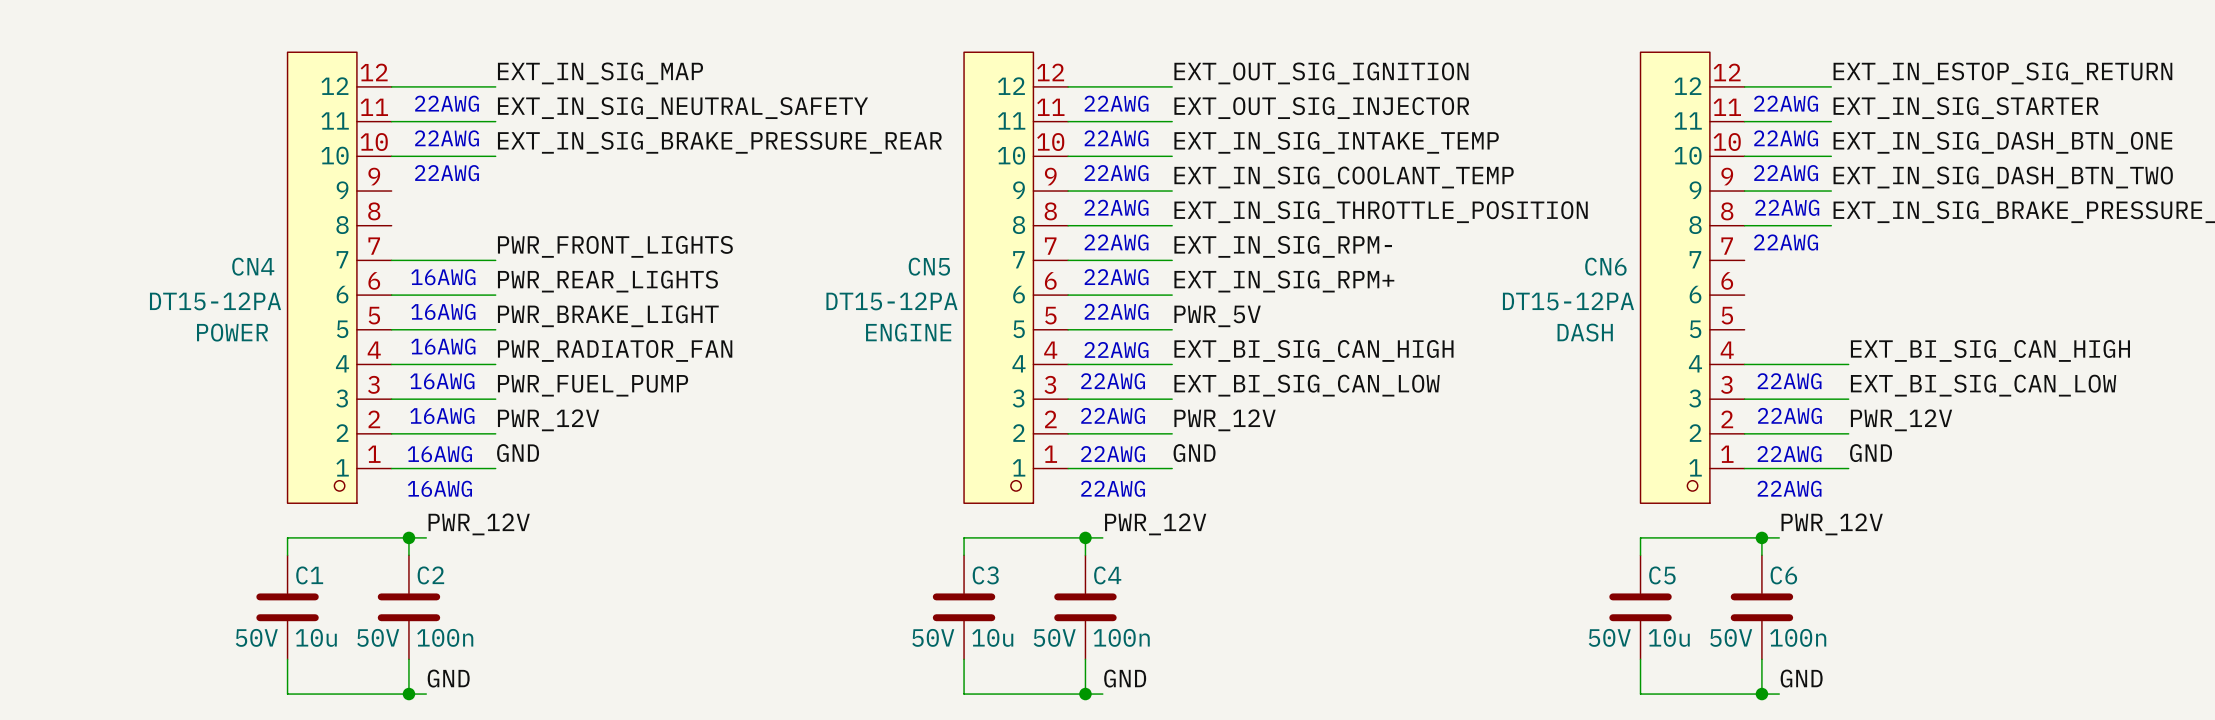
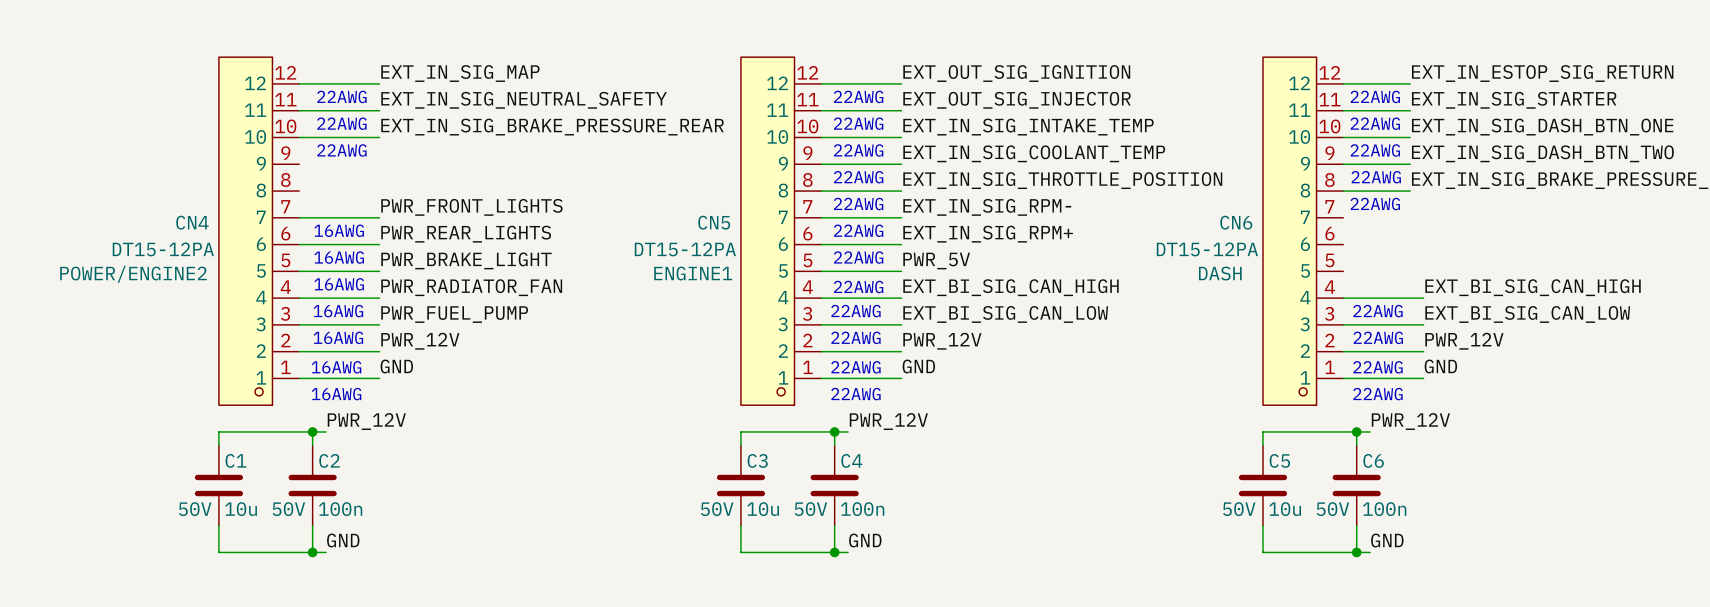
CN4 text: POWER (232, 332) -> POWER/ENGINE2 (133, 274)
CN5 text: ENGINE (908, 332) -> ENGINE1 (693, 273)

